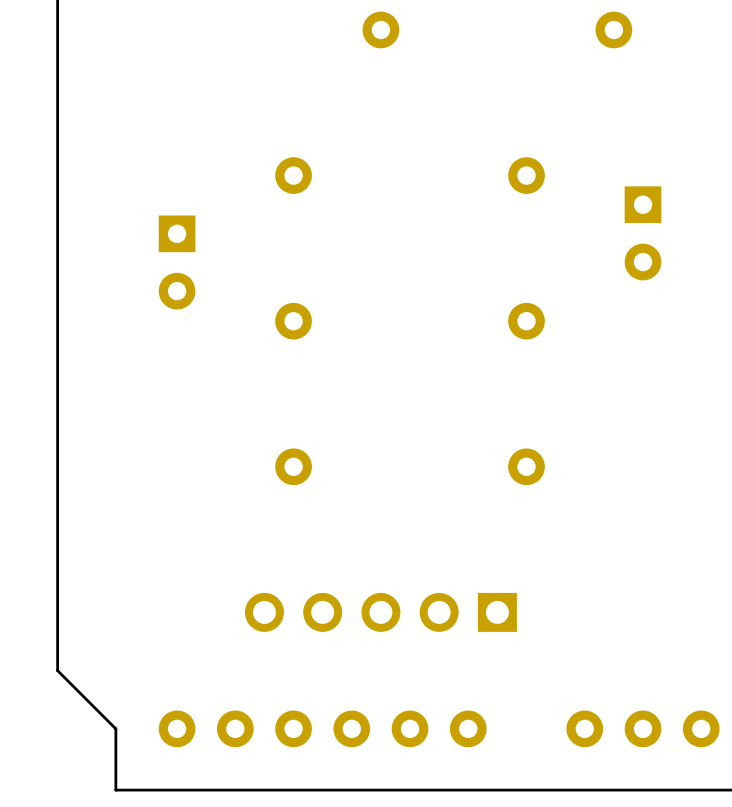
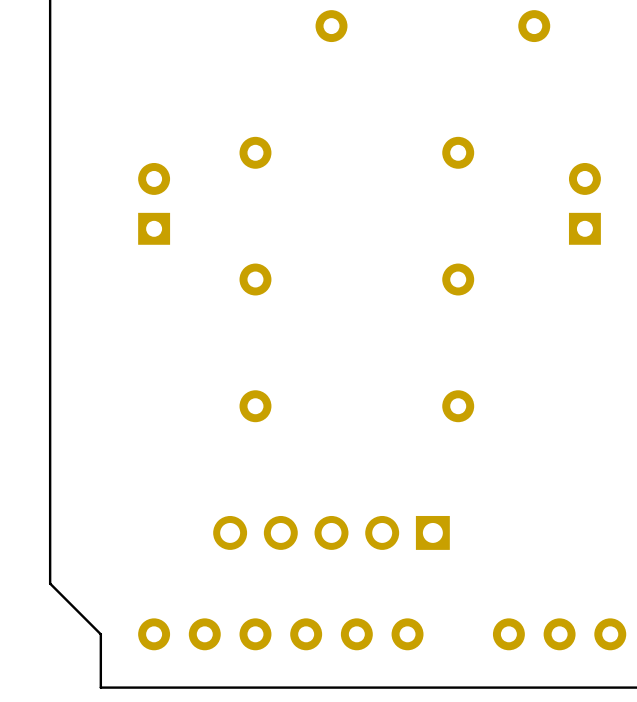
part rotation: 0° (643, 233) -> 180° (584, 203)
part rotation: 0° (177, 262) -> 180° (154, 203)

